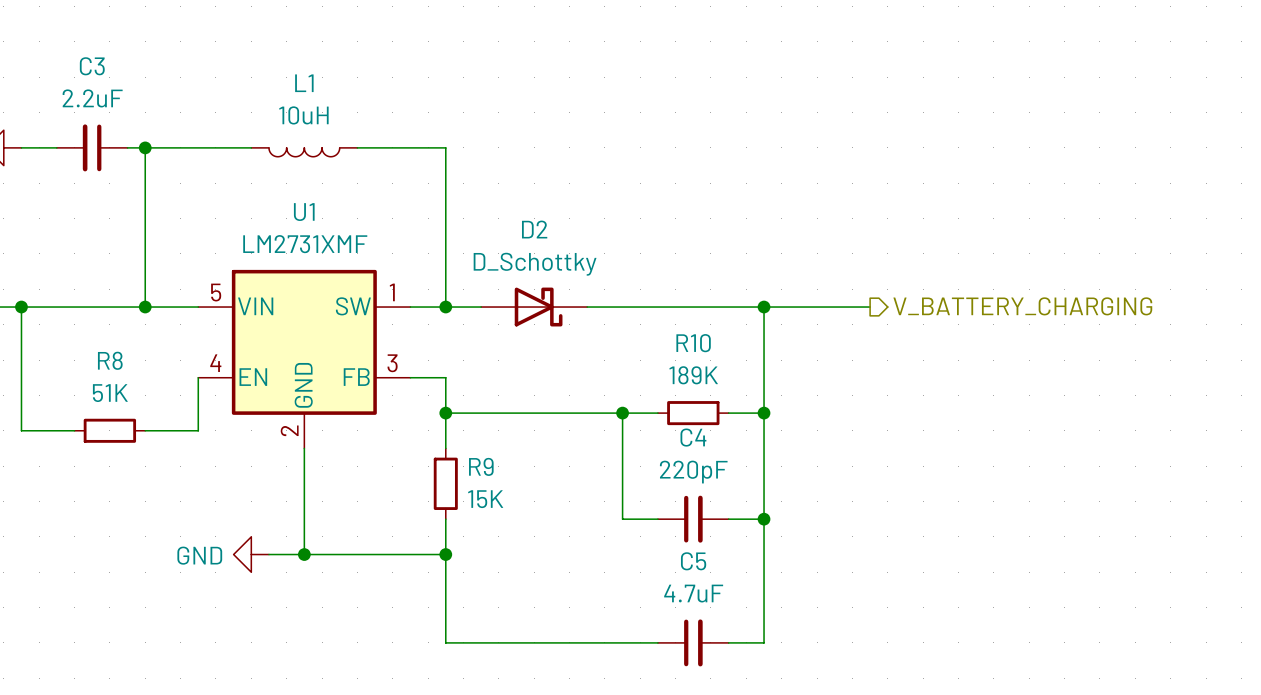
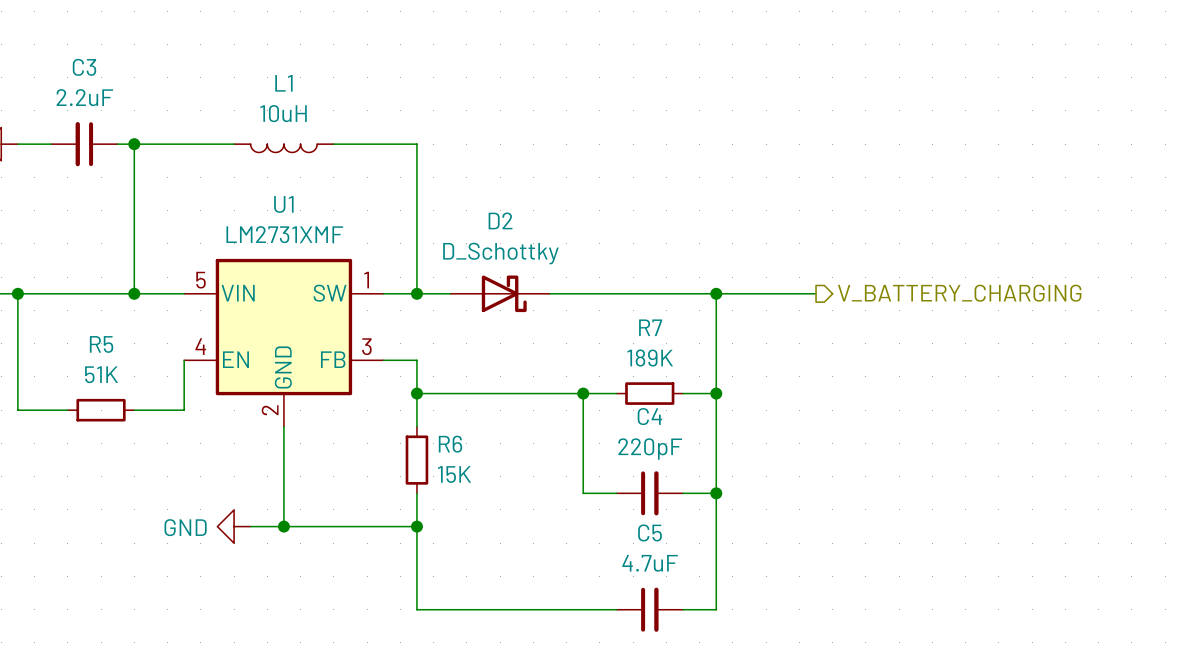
R10 name: R10 (693, 343) -> R7 (650, 327)
R8 name: R8 (110, 360) -> R5 (101, 344)
R9 name: R9 (481, 466) -> R6 (450, 444)

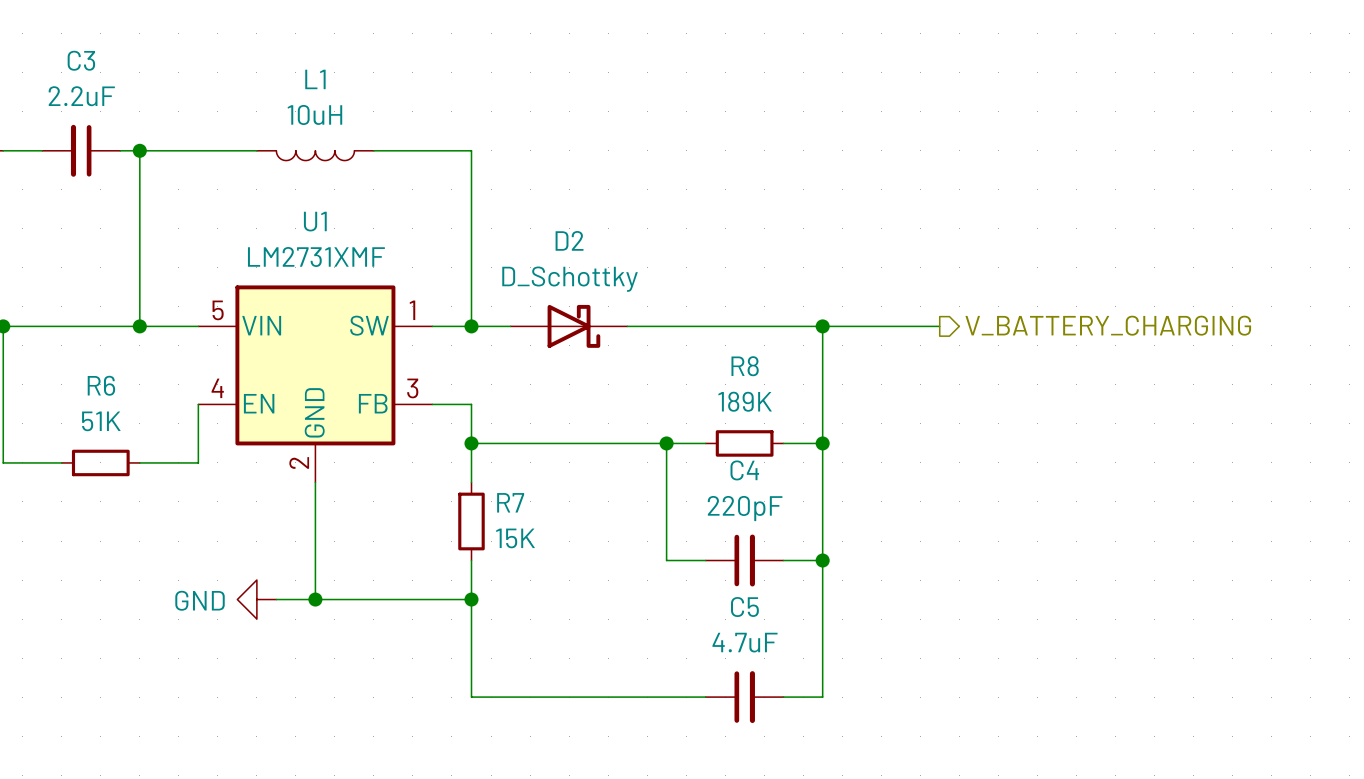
R7 name: R7 (650, 327) -> R8 (745, 366)
R5 name: R5 (101, 344) -> R6 (101, 385)
R6 name: R6 (450, 444) -> R7 (510, 502)

